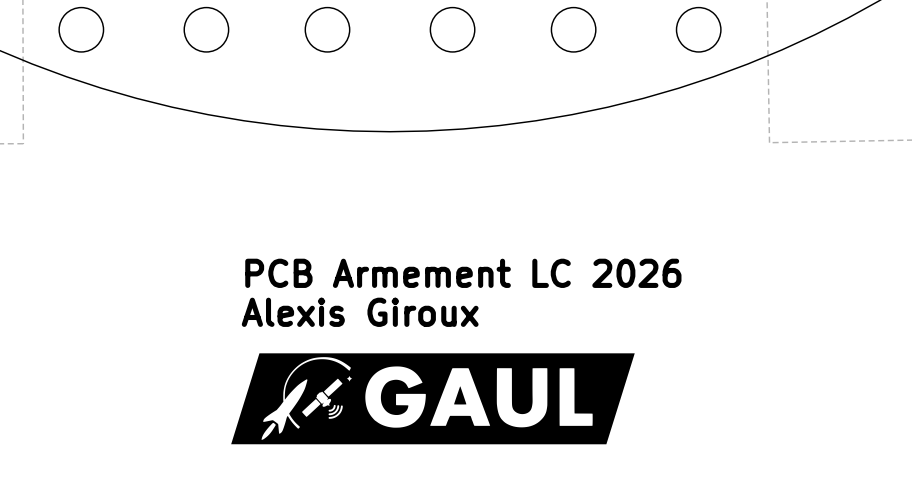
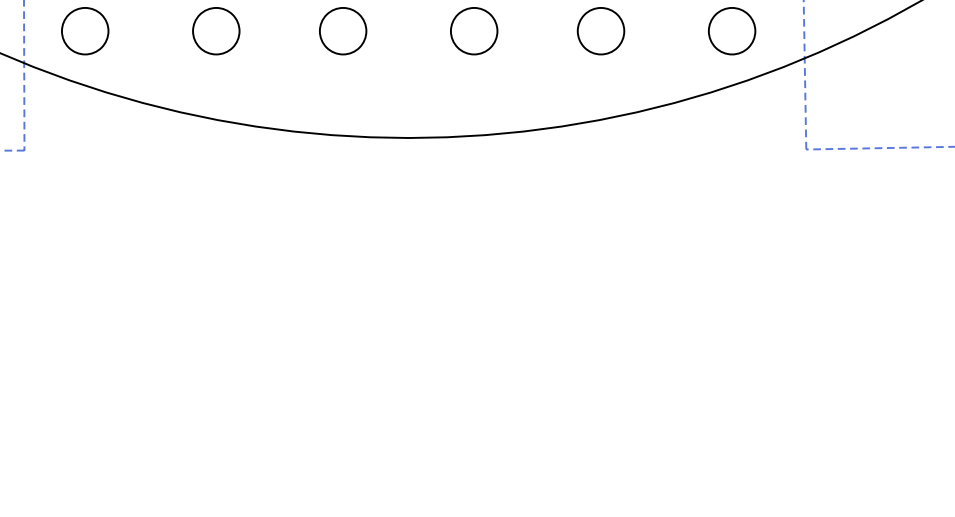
text: PCB Armement LC 2026 (463, 273) -> none
text: Alexis Giroux (360, 312) -> none
drawing: [231, 353, 635, 445] -> none

